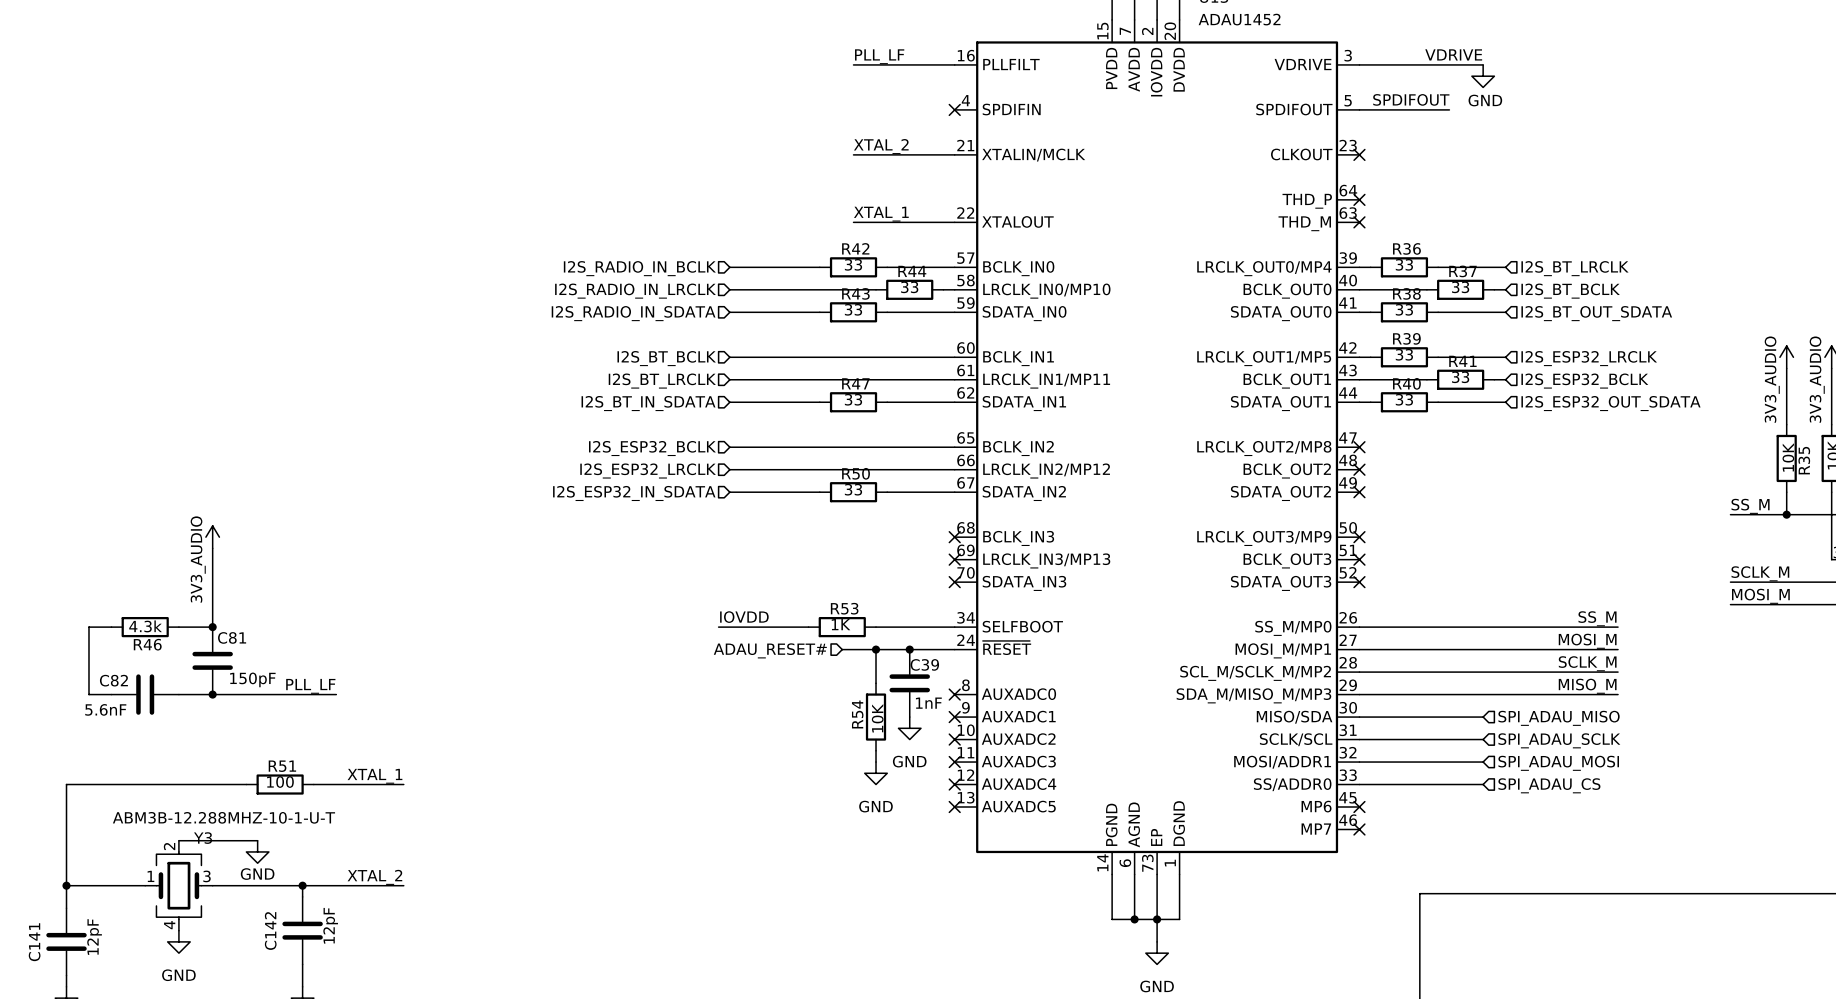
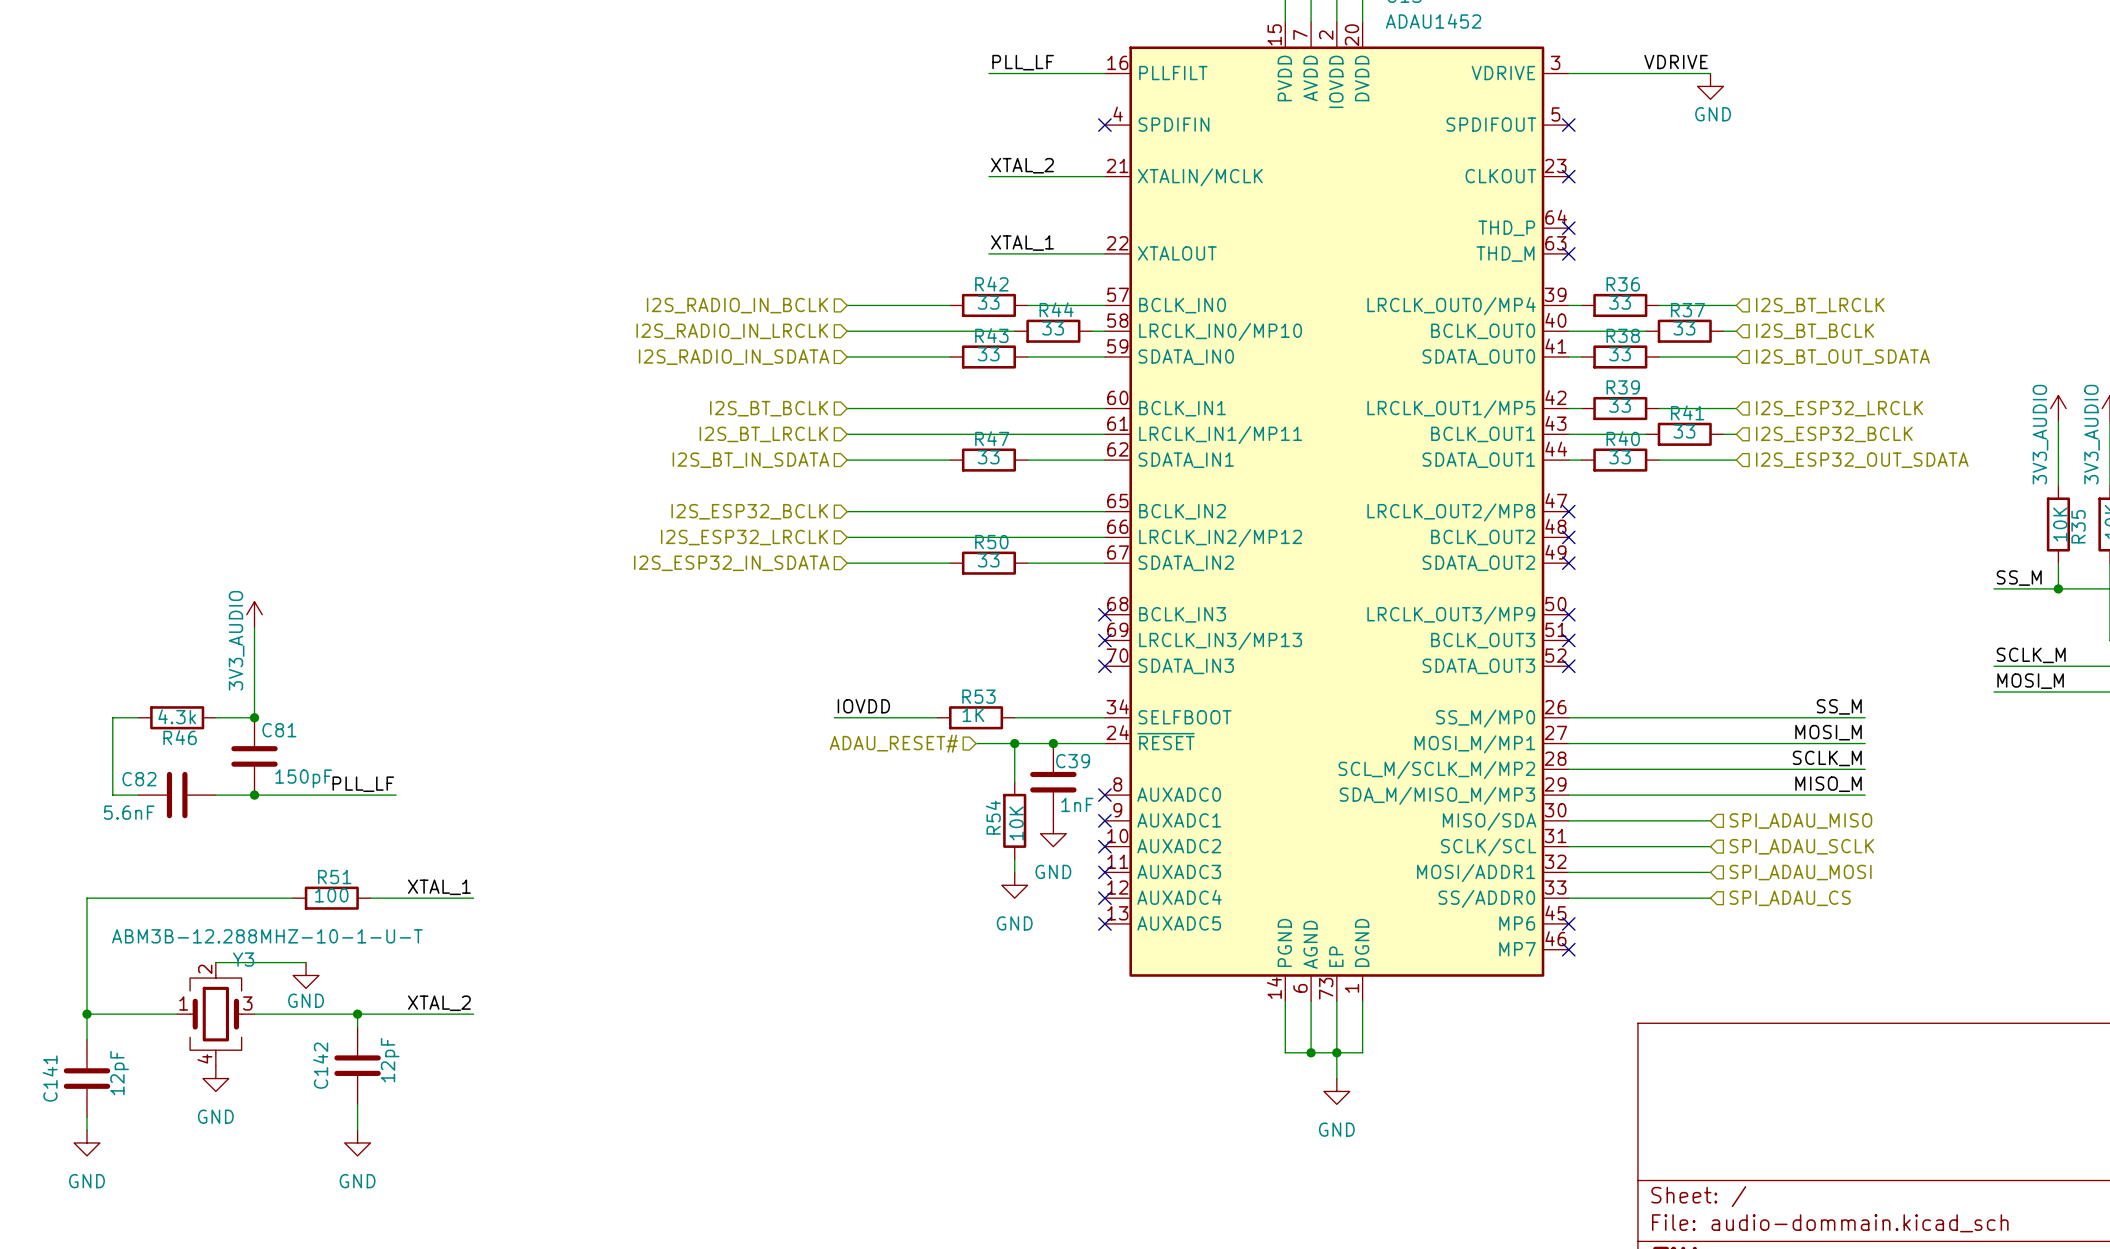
label: SPDIFOUT (1411, 99) -> none
wire: (1359, 109) (1449, 109) -> none
no-connect mark: none -> (1568, 125)

